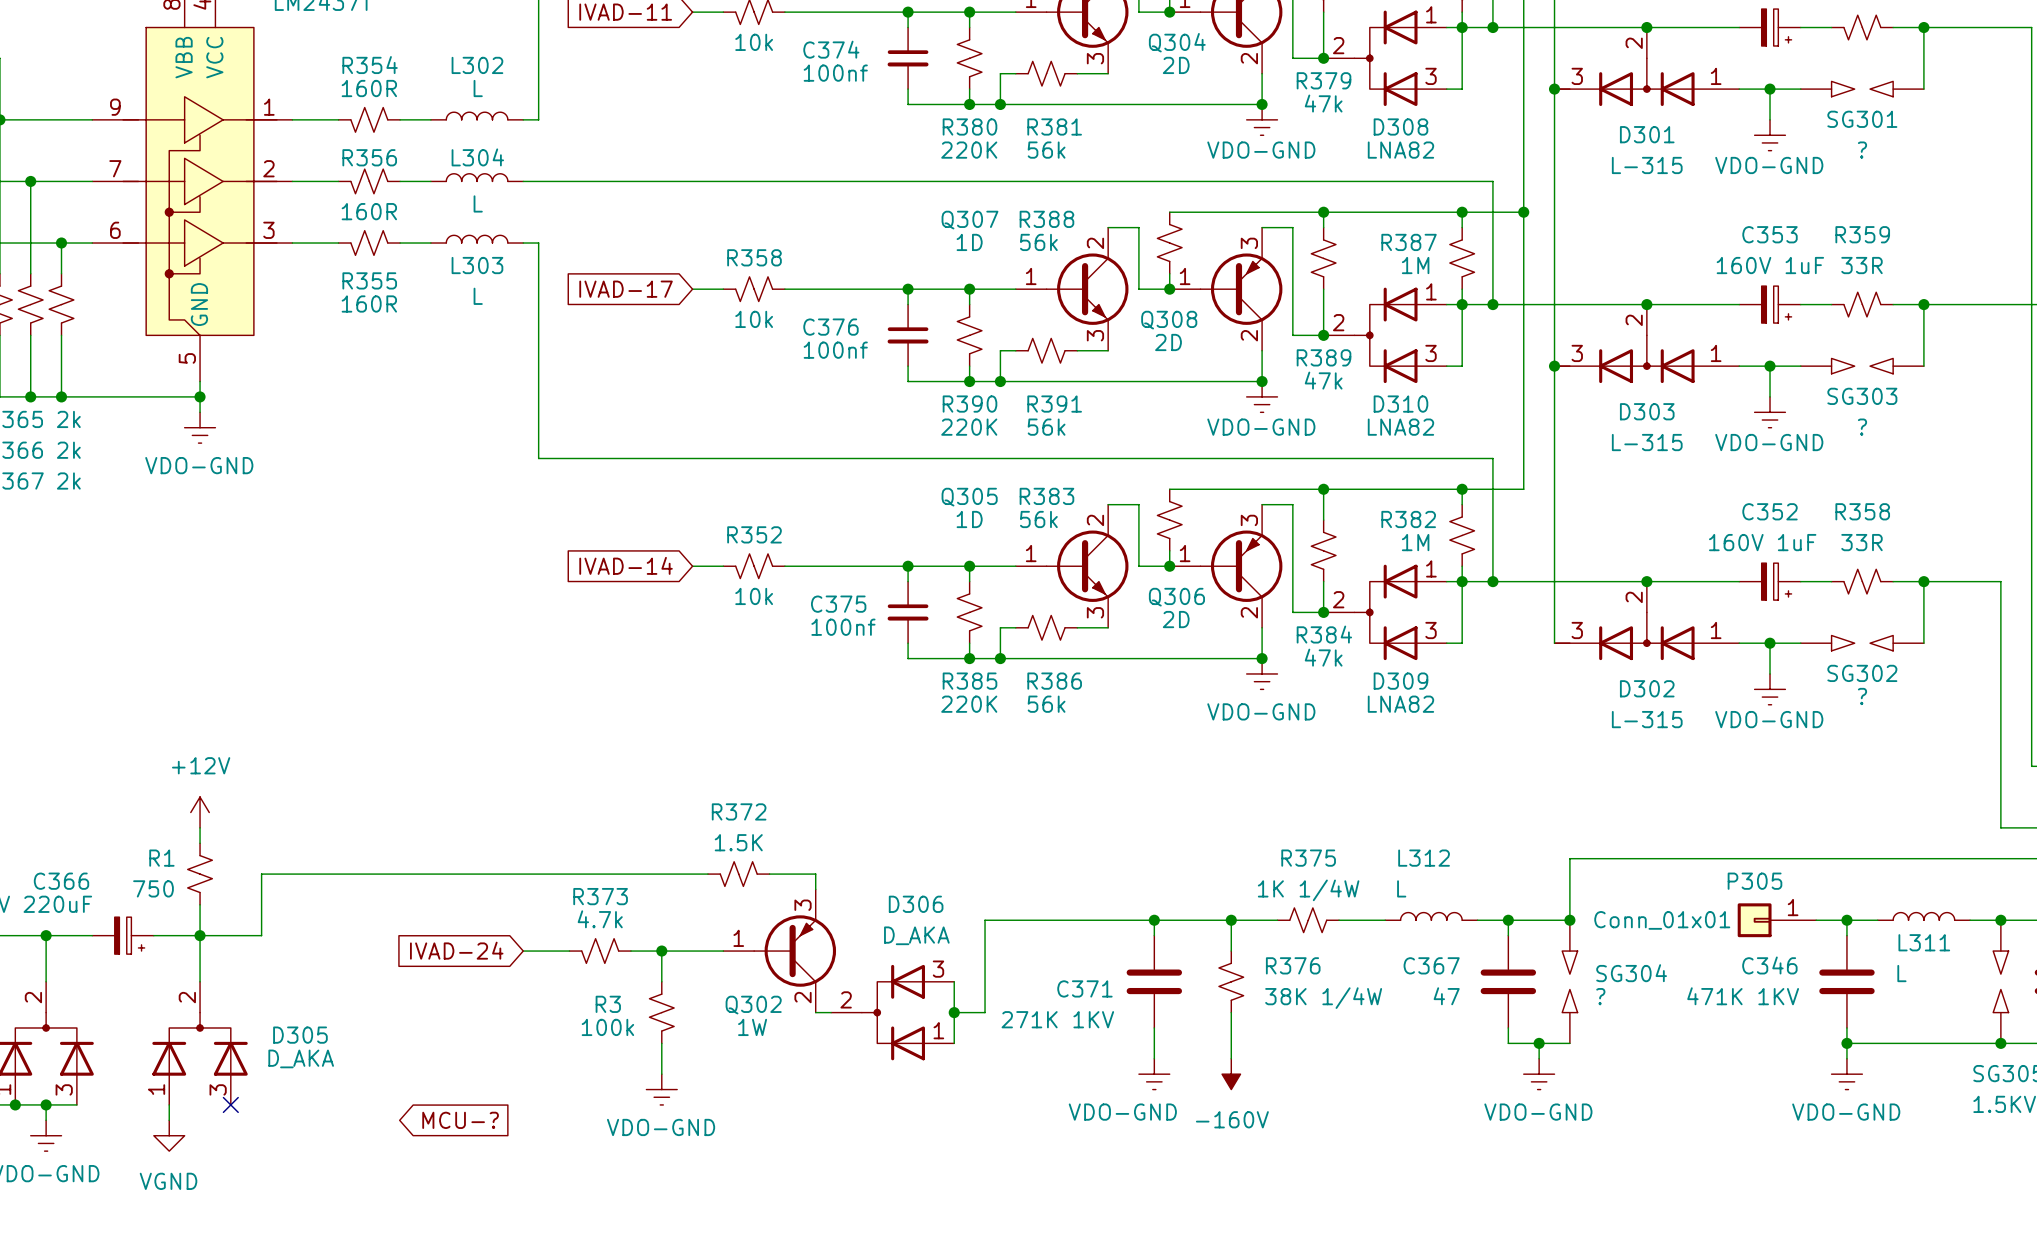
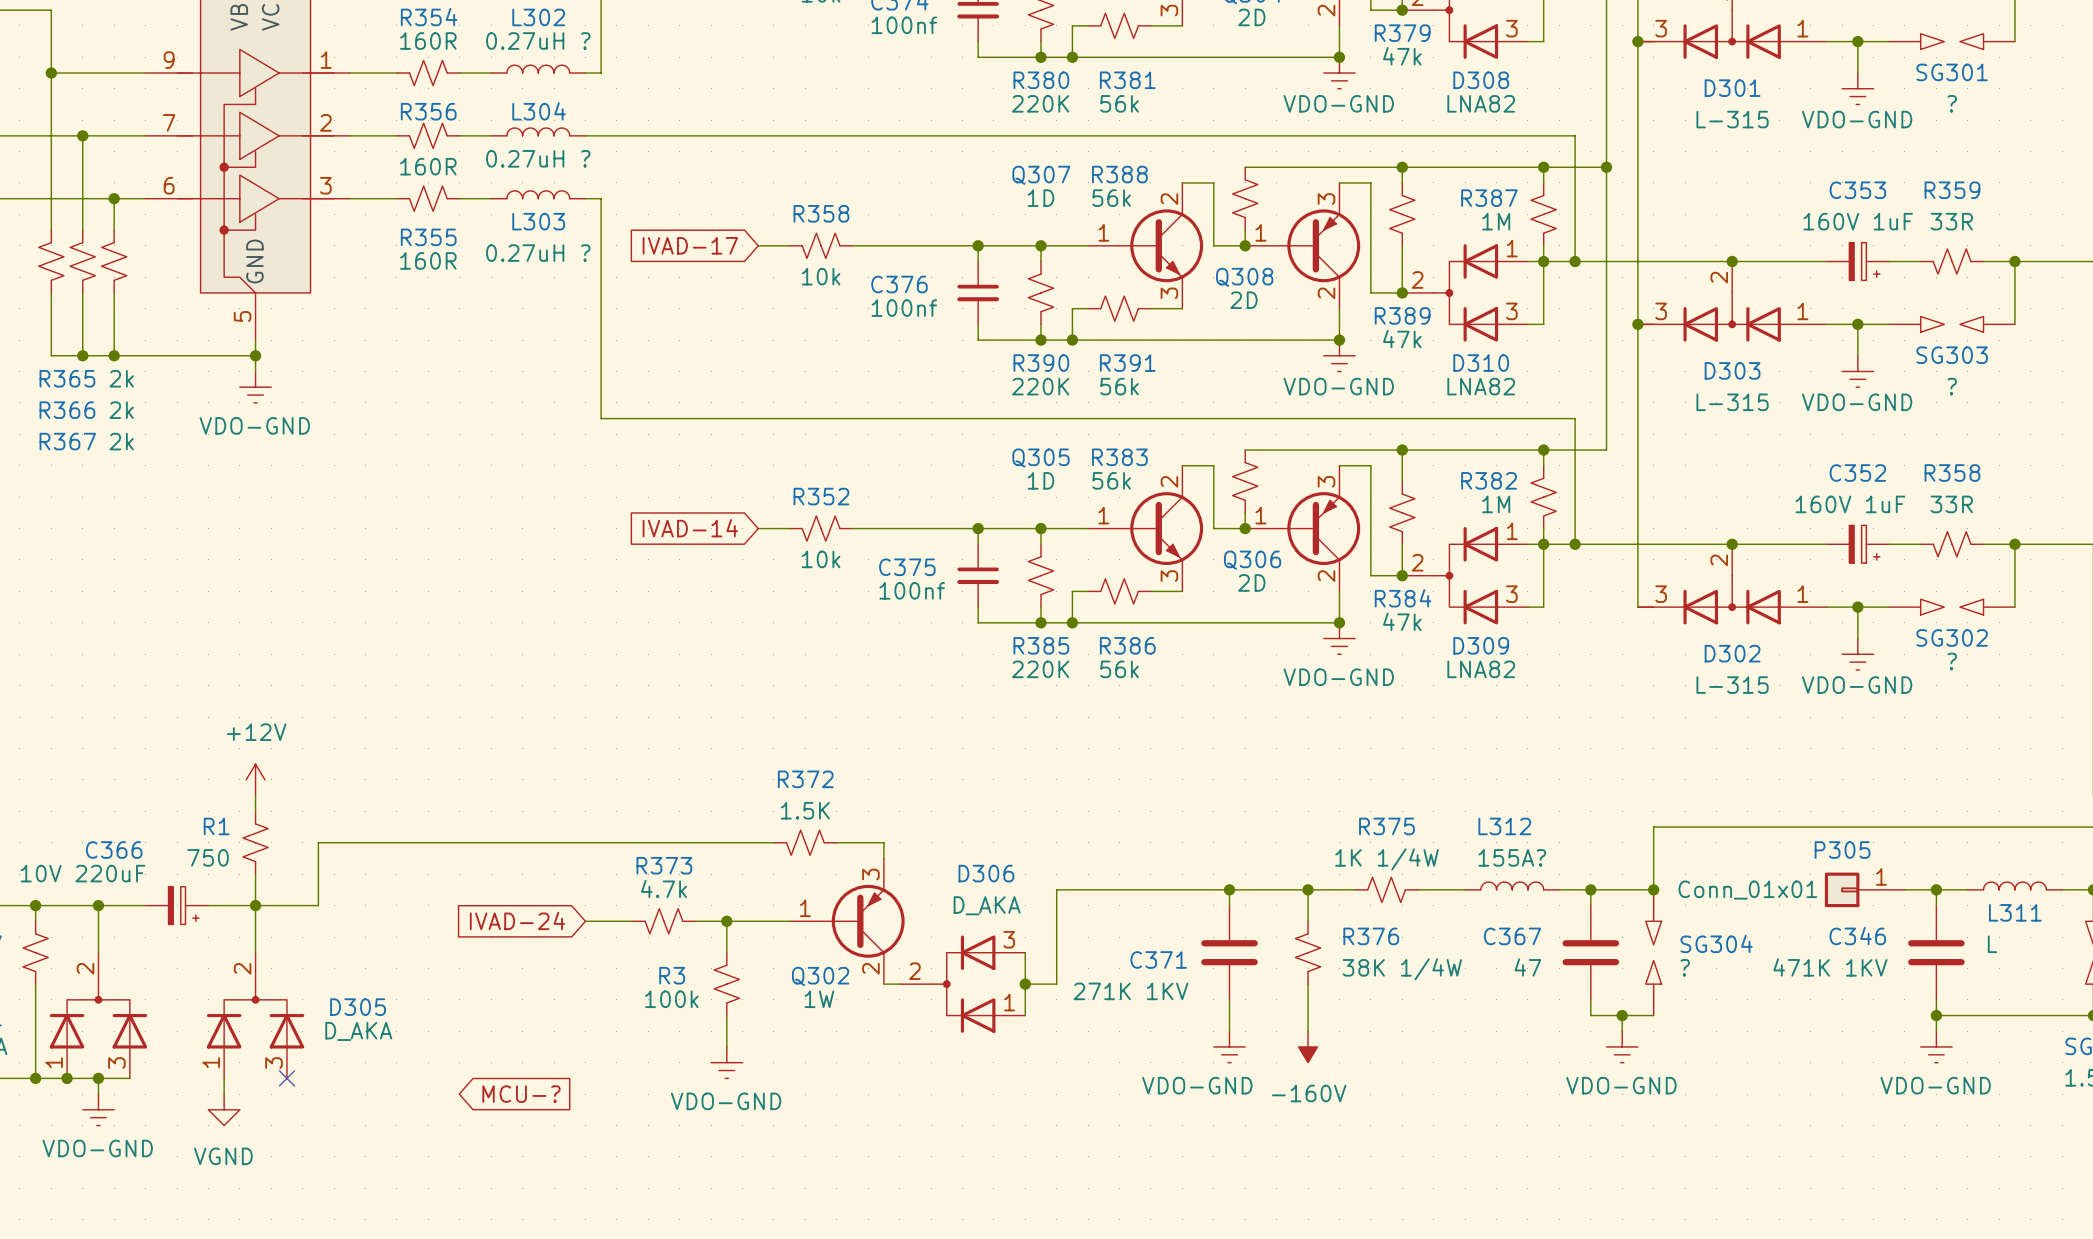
L302 value: L (478, 88) -> 0.27uH ? (538, 41)
L304 value: L (478, 203) -> 0.27uH ? (538, 158)
L303 value: L (478, 296) -> 0.27uH ? (538, 253)
L312 value: L (1401, 888) -> 155A? (1512, 857)

